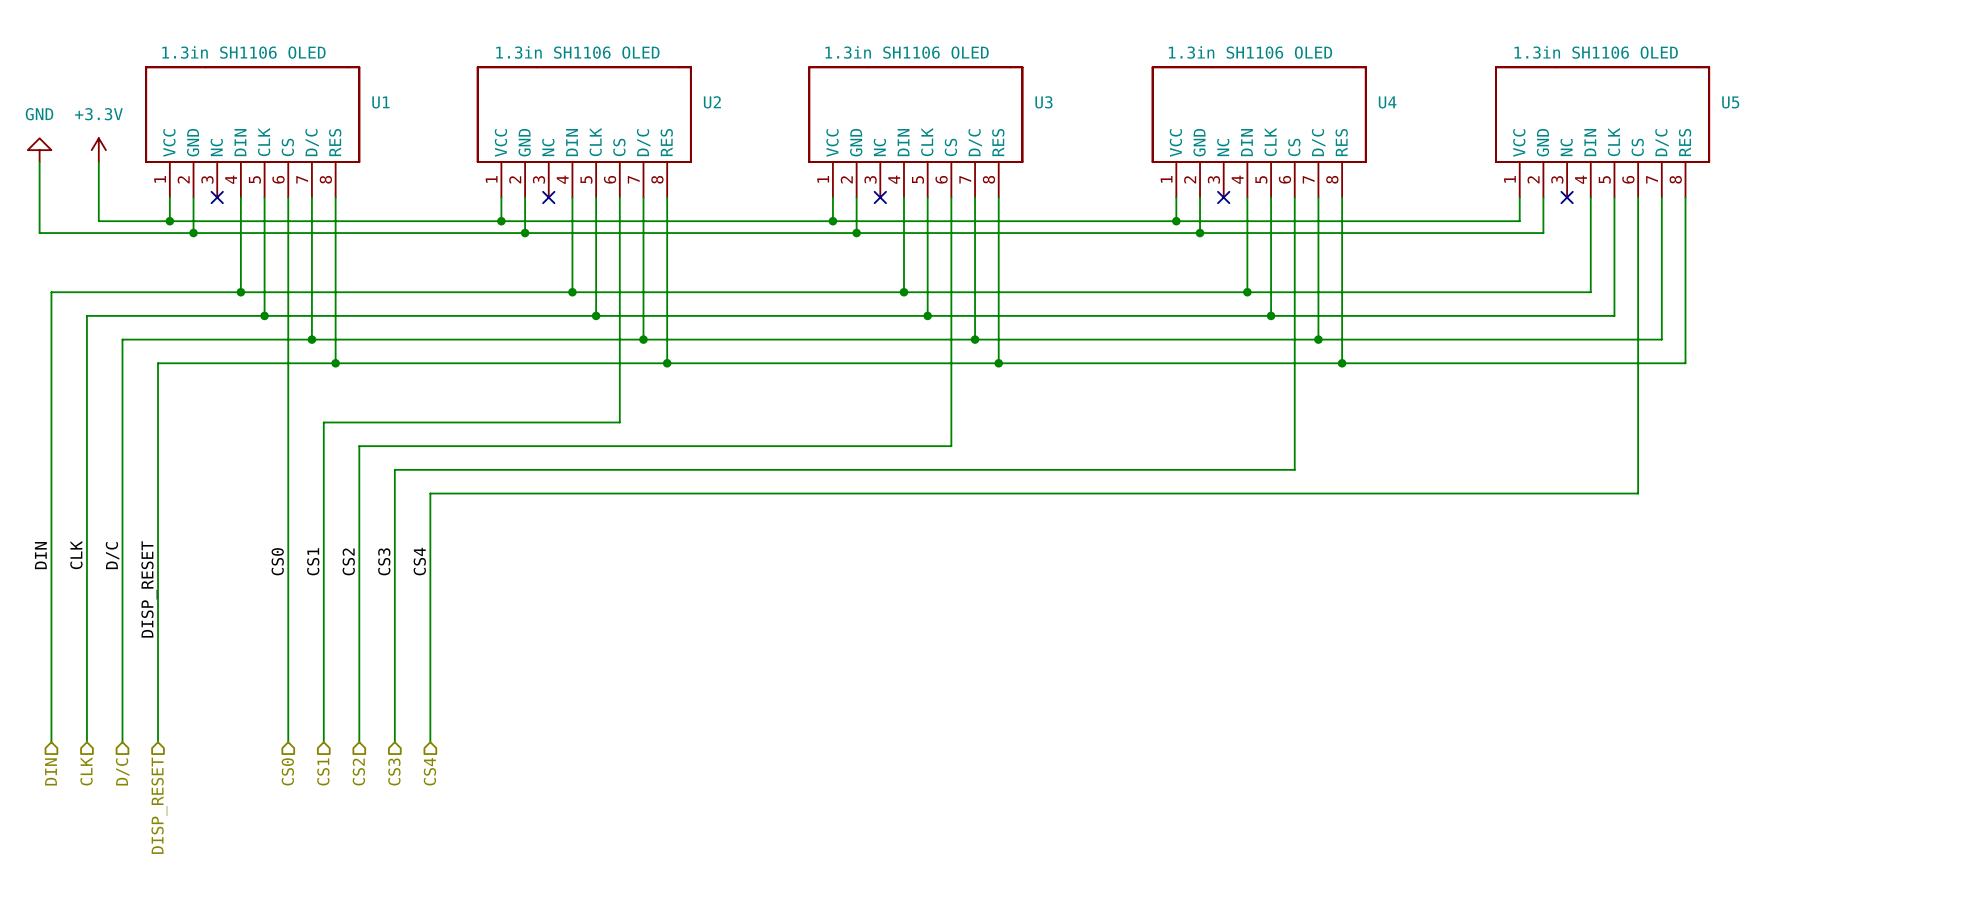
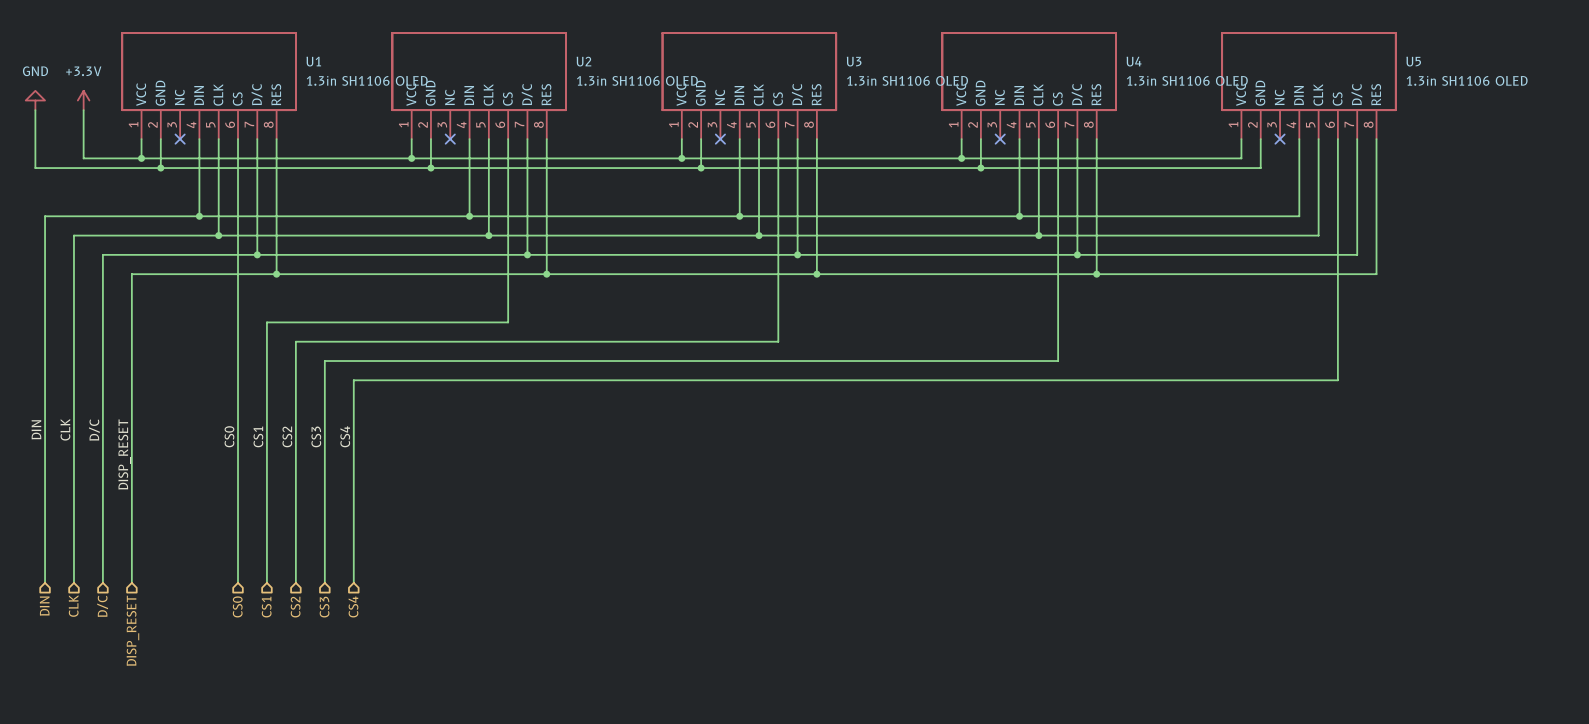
U1 value position: 1.3in SH1106 OLED (243, 52) -> 1.3in SH1106 OLED (367, 80)
U2 value position: 1.3in SH1106 OLED (577, 52) -> 1.3in SH1106 OLED (637, 80)
U3 value position: 1.3in SH1106 OLED (907, 52) -> 1.3in SH1106 OLED (907, 80)
U4 value position: 1.3in SH1106 OLED (1250, 52) -> 1.3in SH1106 OLED (1187, 80)
U5 value position: 1.3in SH1106 OLED (1596, 52) -> 1.3in SH1106 OLED (1467, 80)

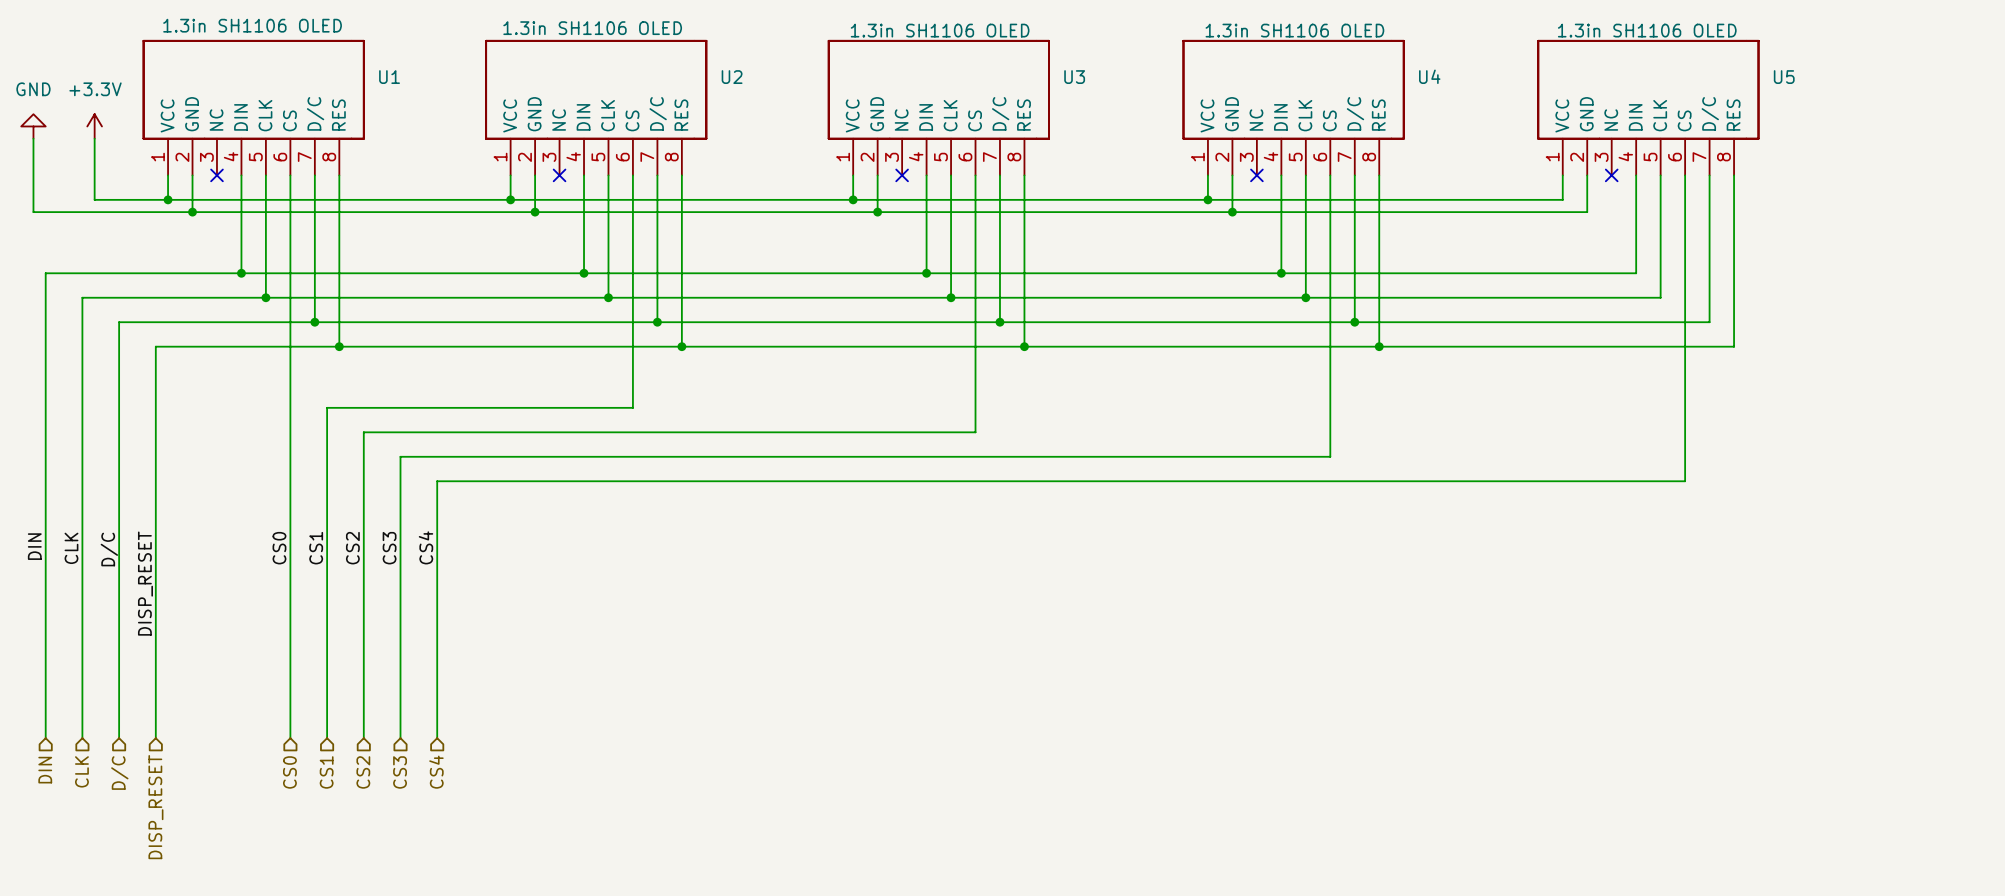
U1 value position: 1.3in SH1106 OLED (367, 80) -> 1.3in SH1106 OLED (252, 25)
U2 value position: 1.3in SH1106 OLED (637, 80) -> 1.3in SH1106 OLED (592, 28)
U3 value position: 1.3in SH1106 OLED (907, 80) -> 1.3in SH1106 OLED (940, 30)
U4 value position: 1.3in SH1106 OLED (1187, 80) -> 1.3in SH1106 OLED (1294, 30)
U5 value position: 1.3in SH1106 OLED (1467, 80) -> 1.3in SH1106 OLED (1647, 30)

